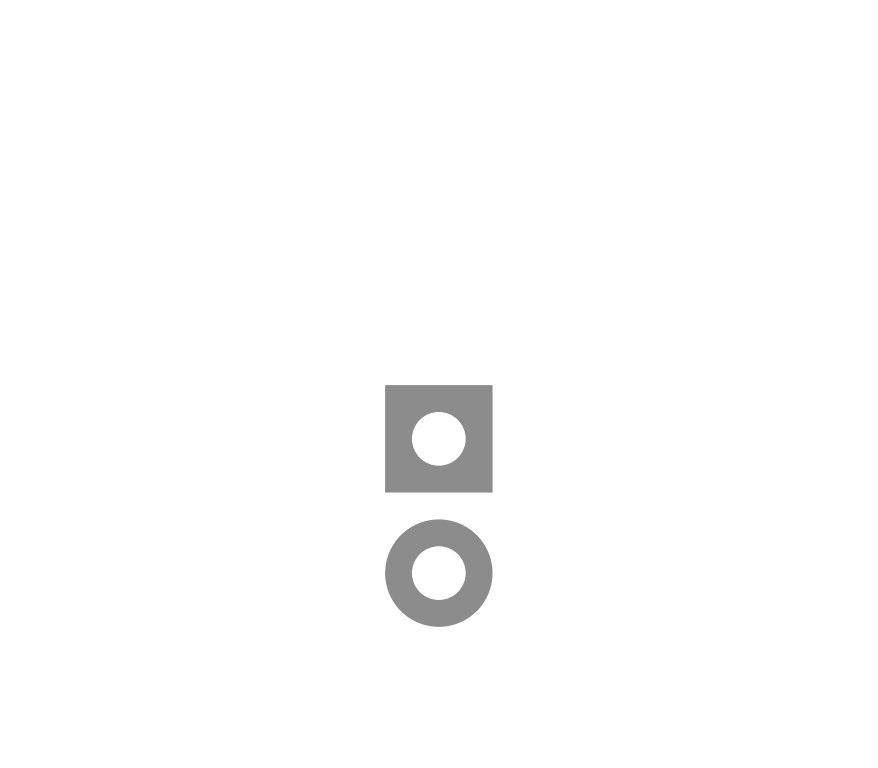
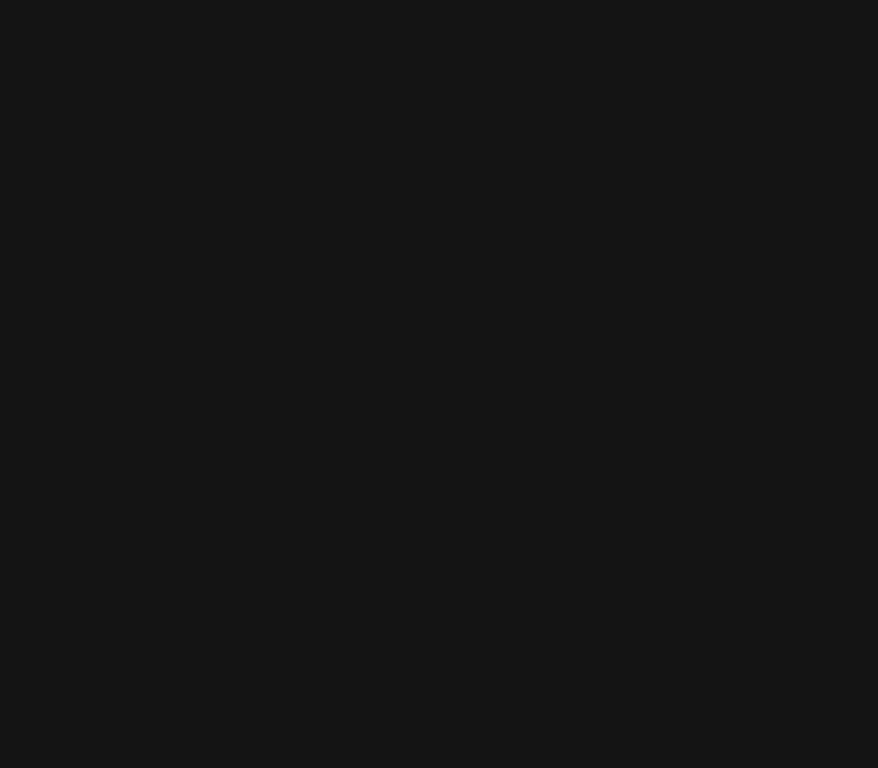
part: (438, 505) -> none

